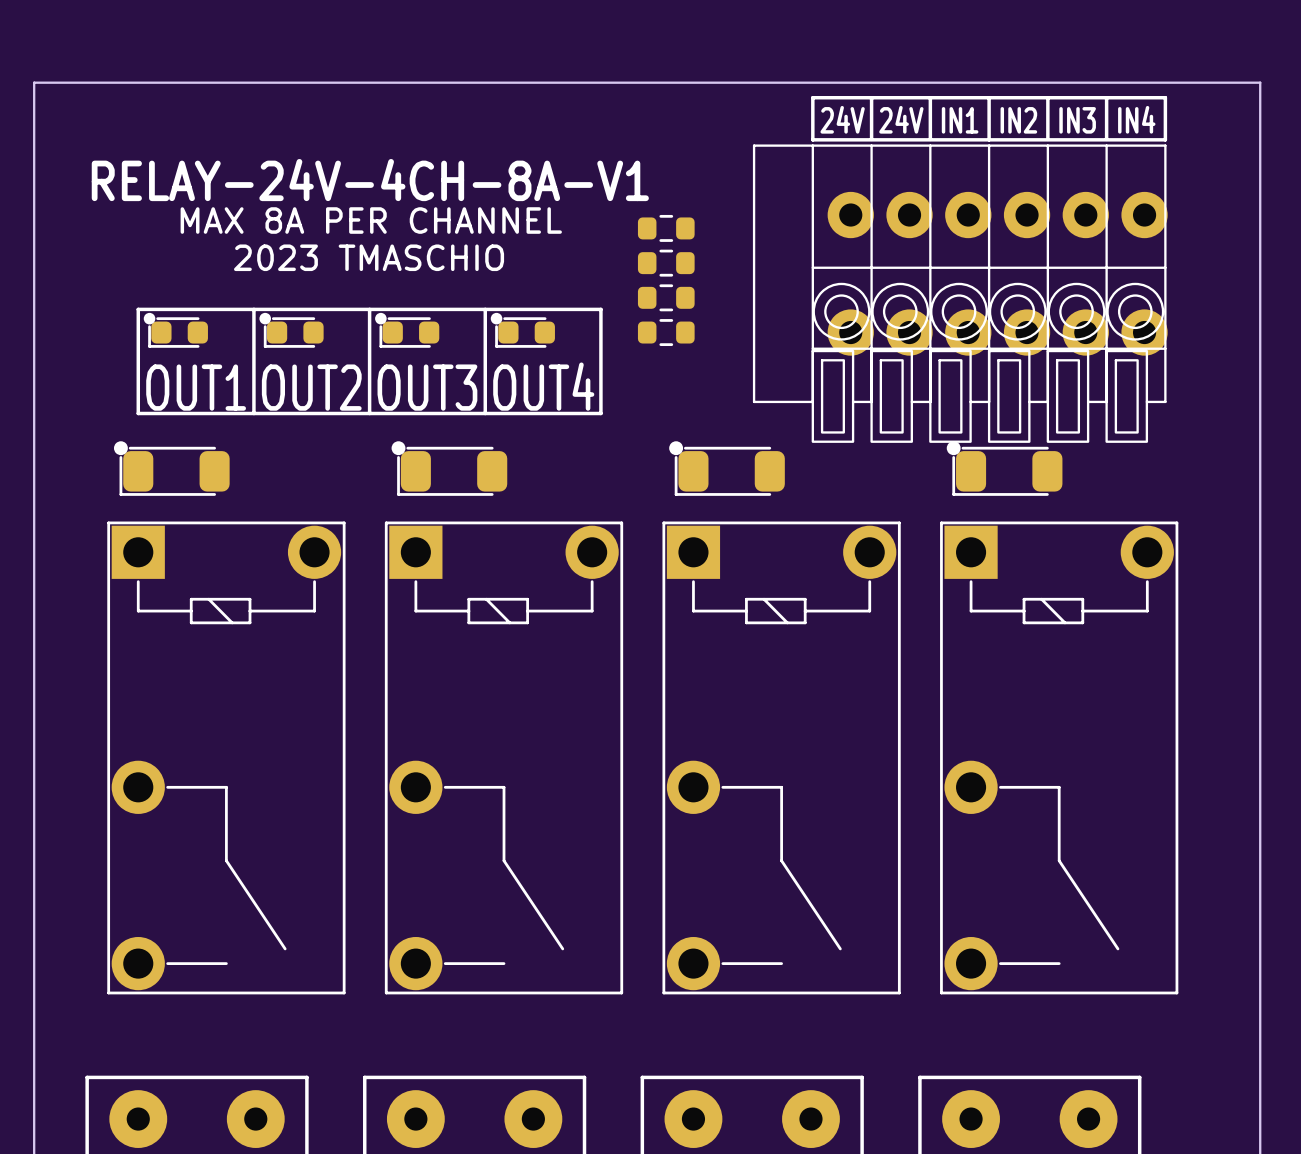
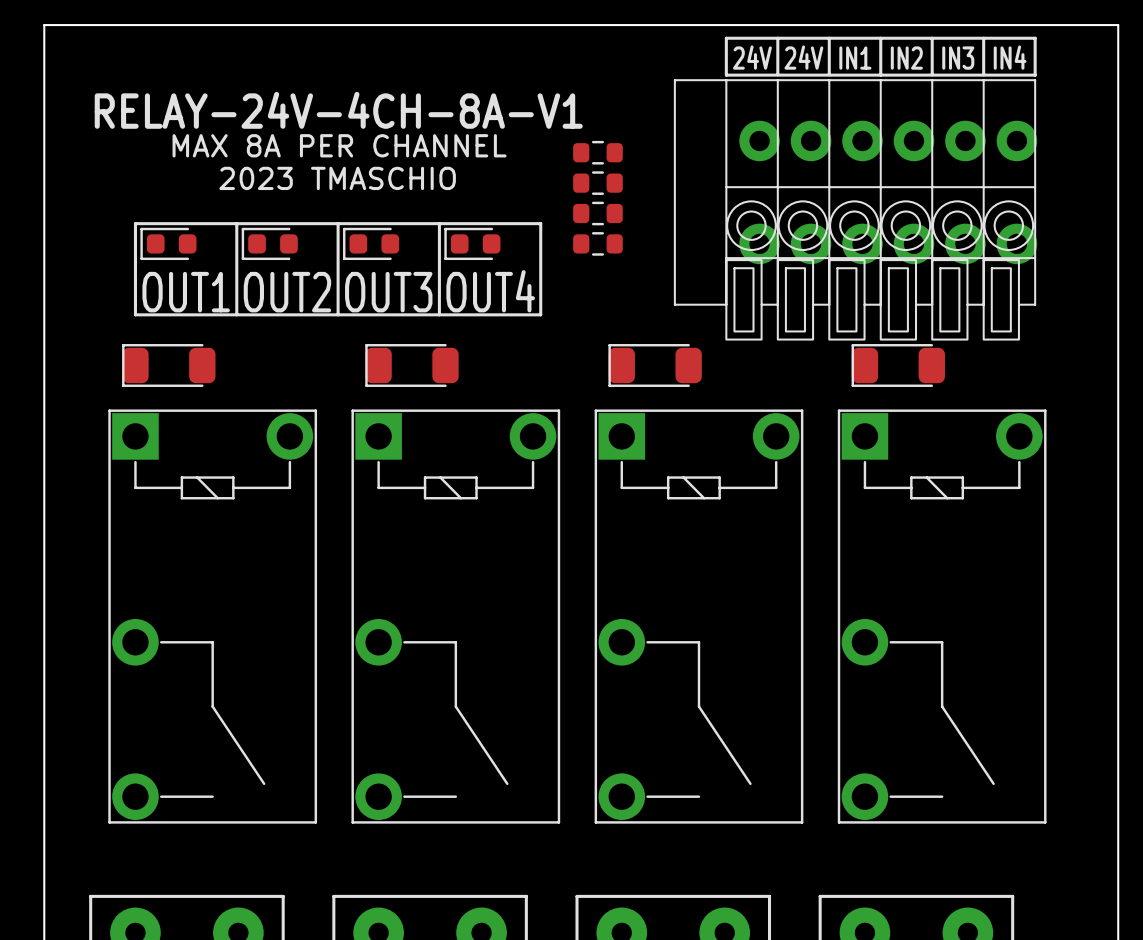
part footprint: [143, 312, 208, 348] -> [140, 227, 197, 261]
part footprint: [259, 312, 324, 348] -> [241, 227, 298, 261]
part footprint: [375, 312, 440, 348] -> [343, 227, 400, 261]
part footprint: [490, 312, 555, 348] -> [444, 227, 501, 261]
part footprint: [113, 441, 230, 496] -> [122, 344, 216, 387]
part footprint: [391, 441, 508, 496] -> [365, 344, 459, 387]
part footprint: [669, 441, 785, 496] -> [608, 344, 702, 387]
part footprint: [946, 441, 1063, 496] -> [851, 344, 945, 387]

